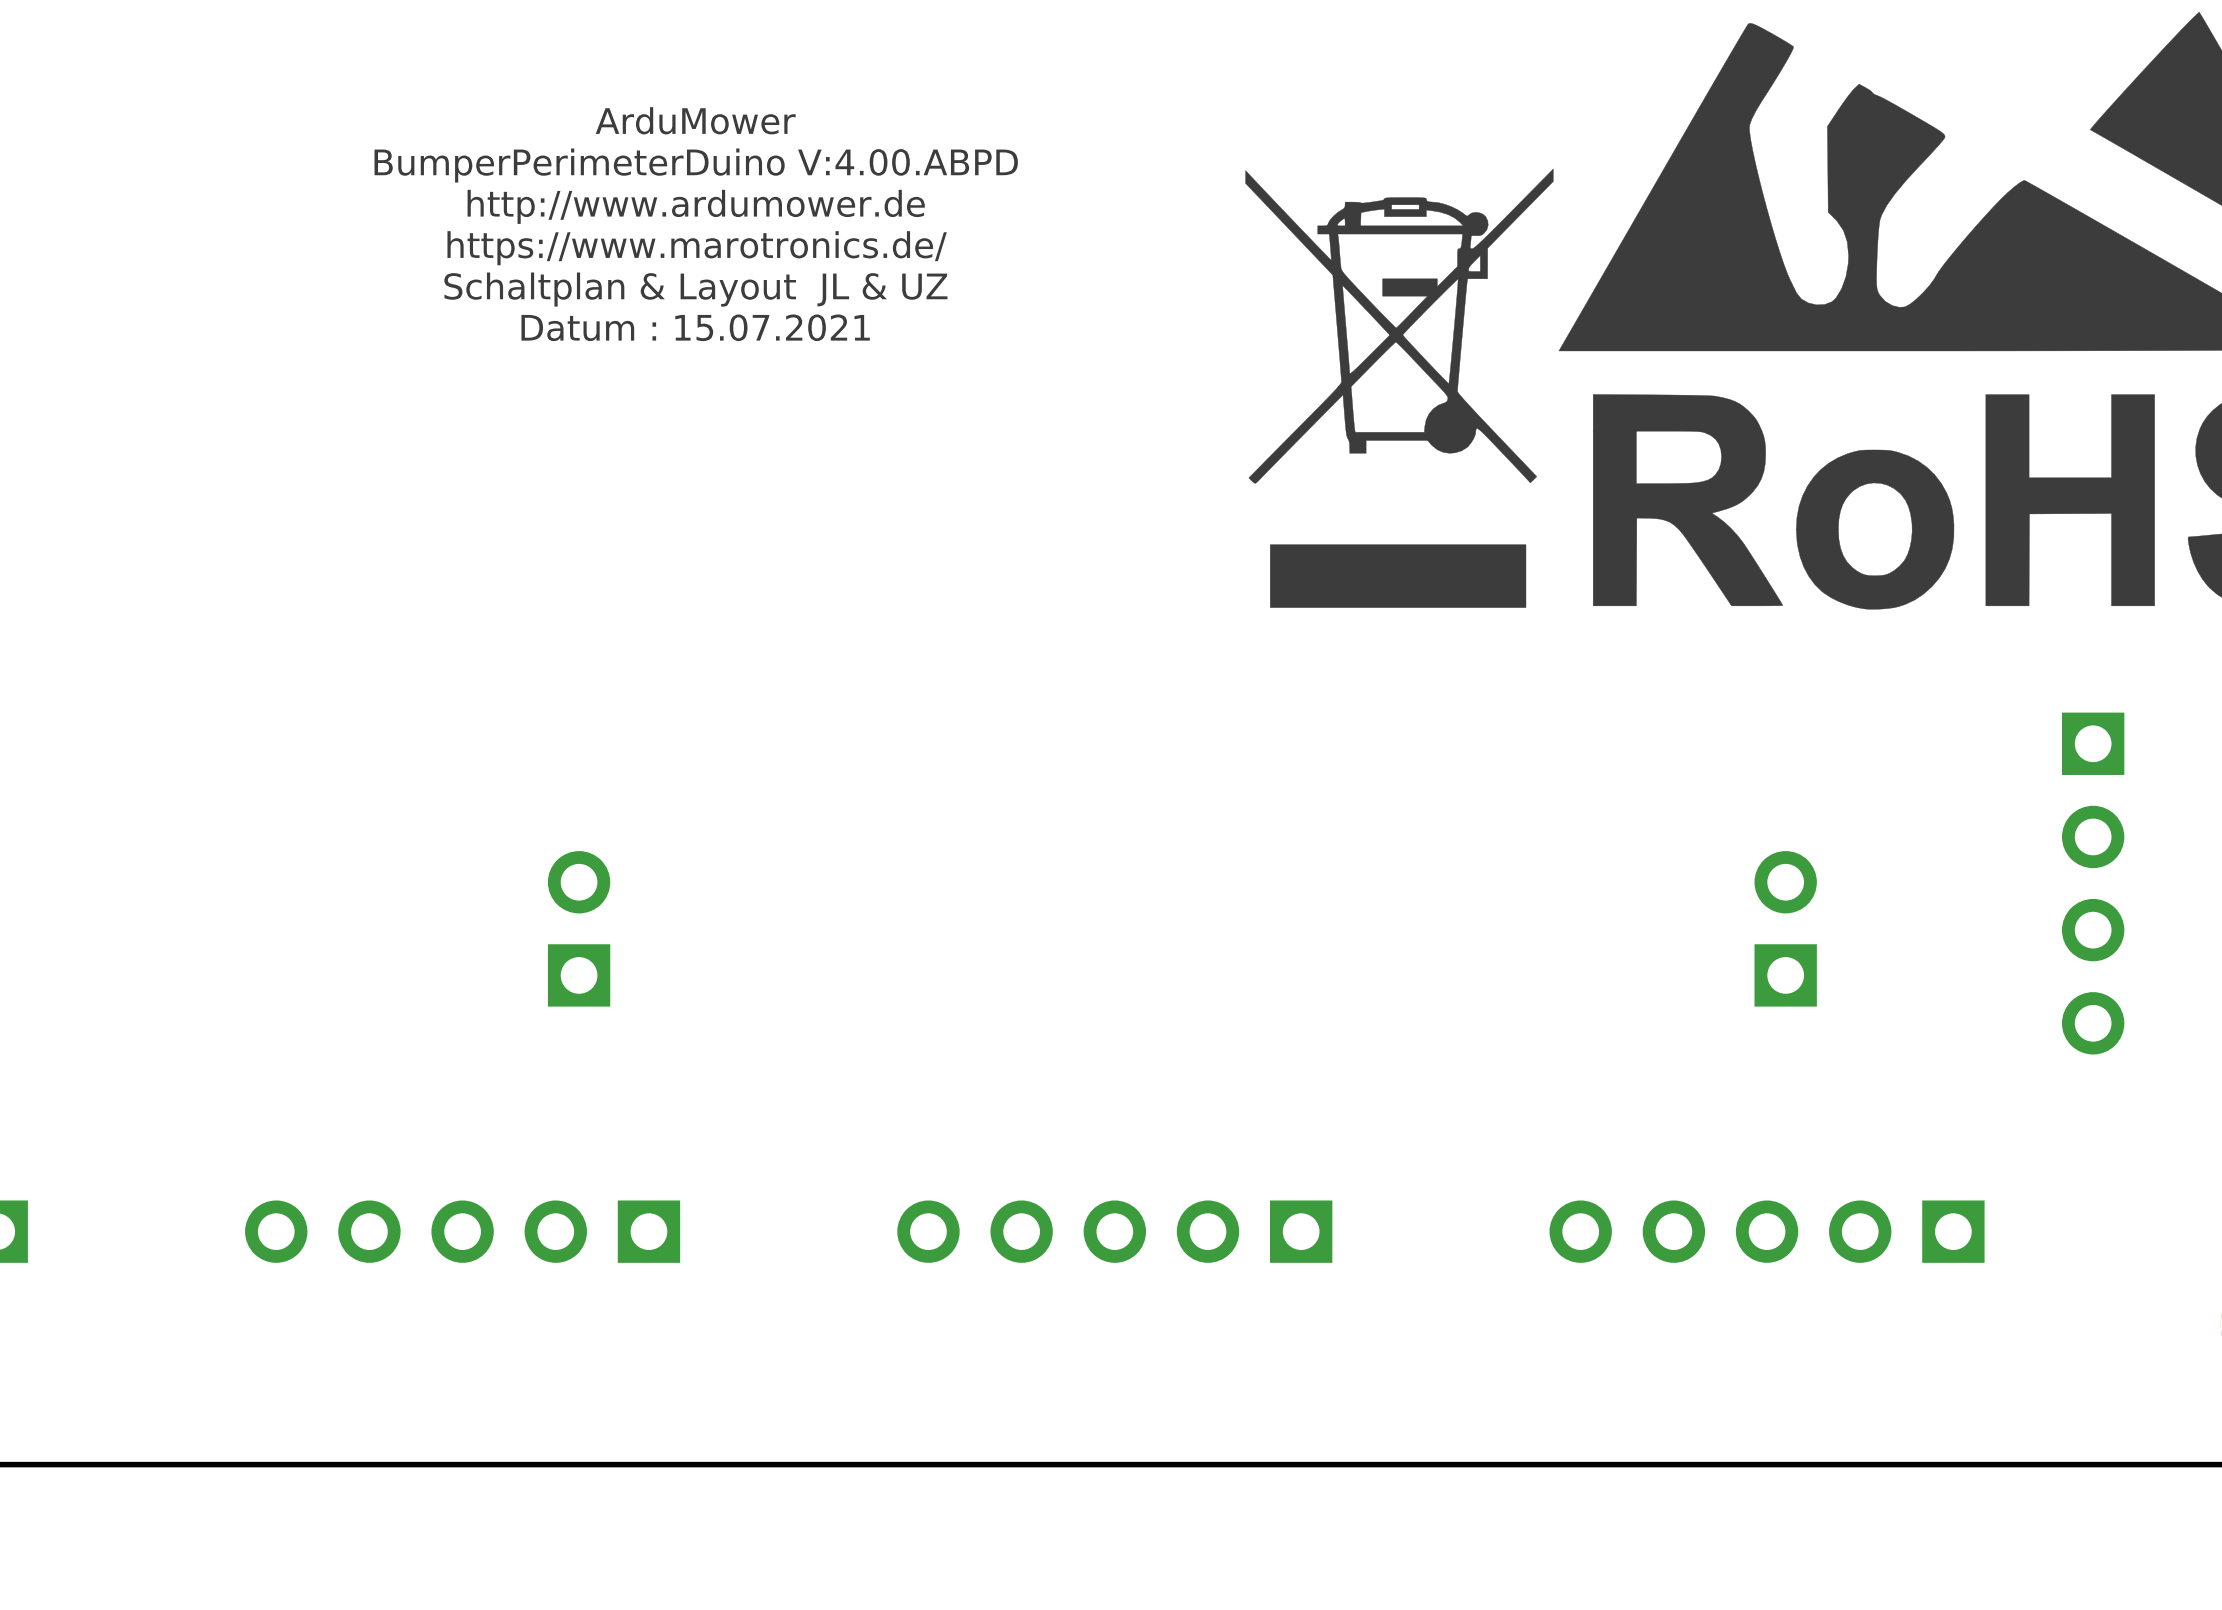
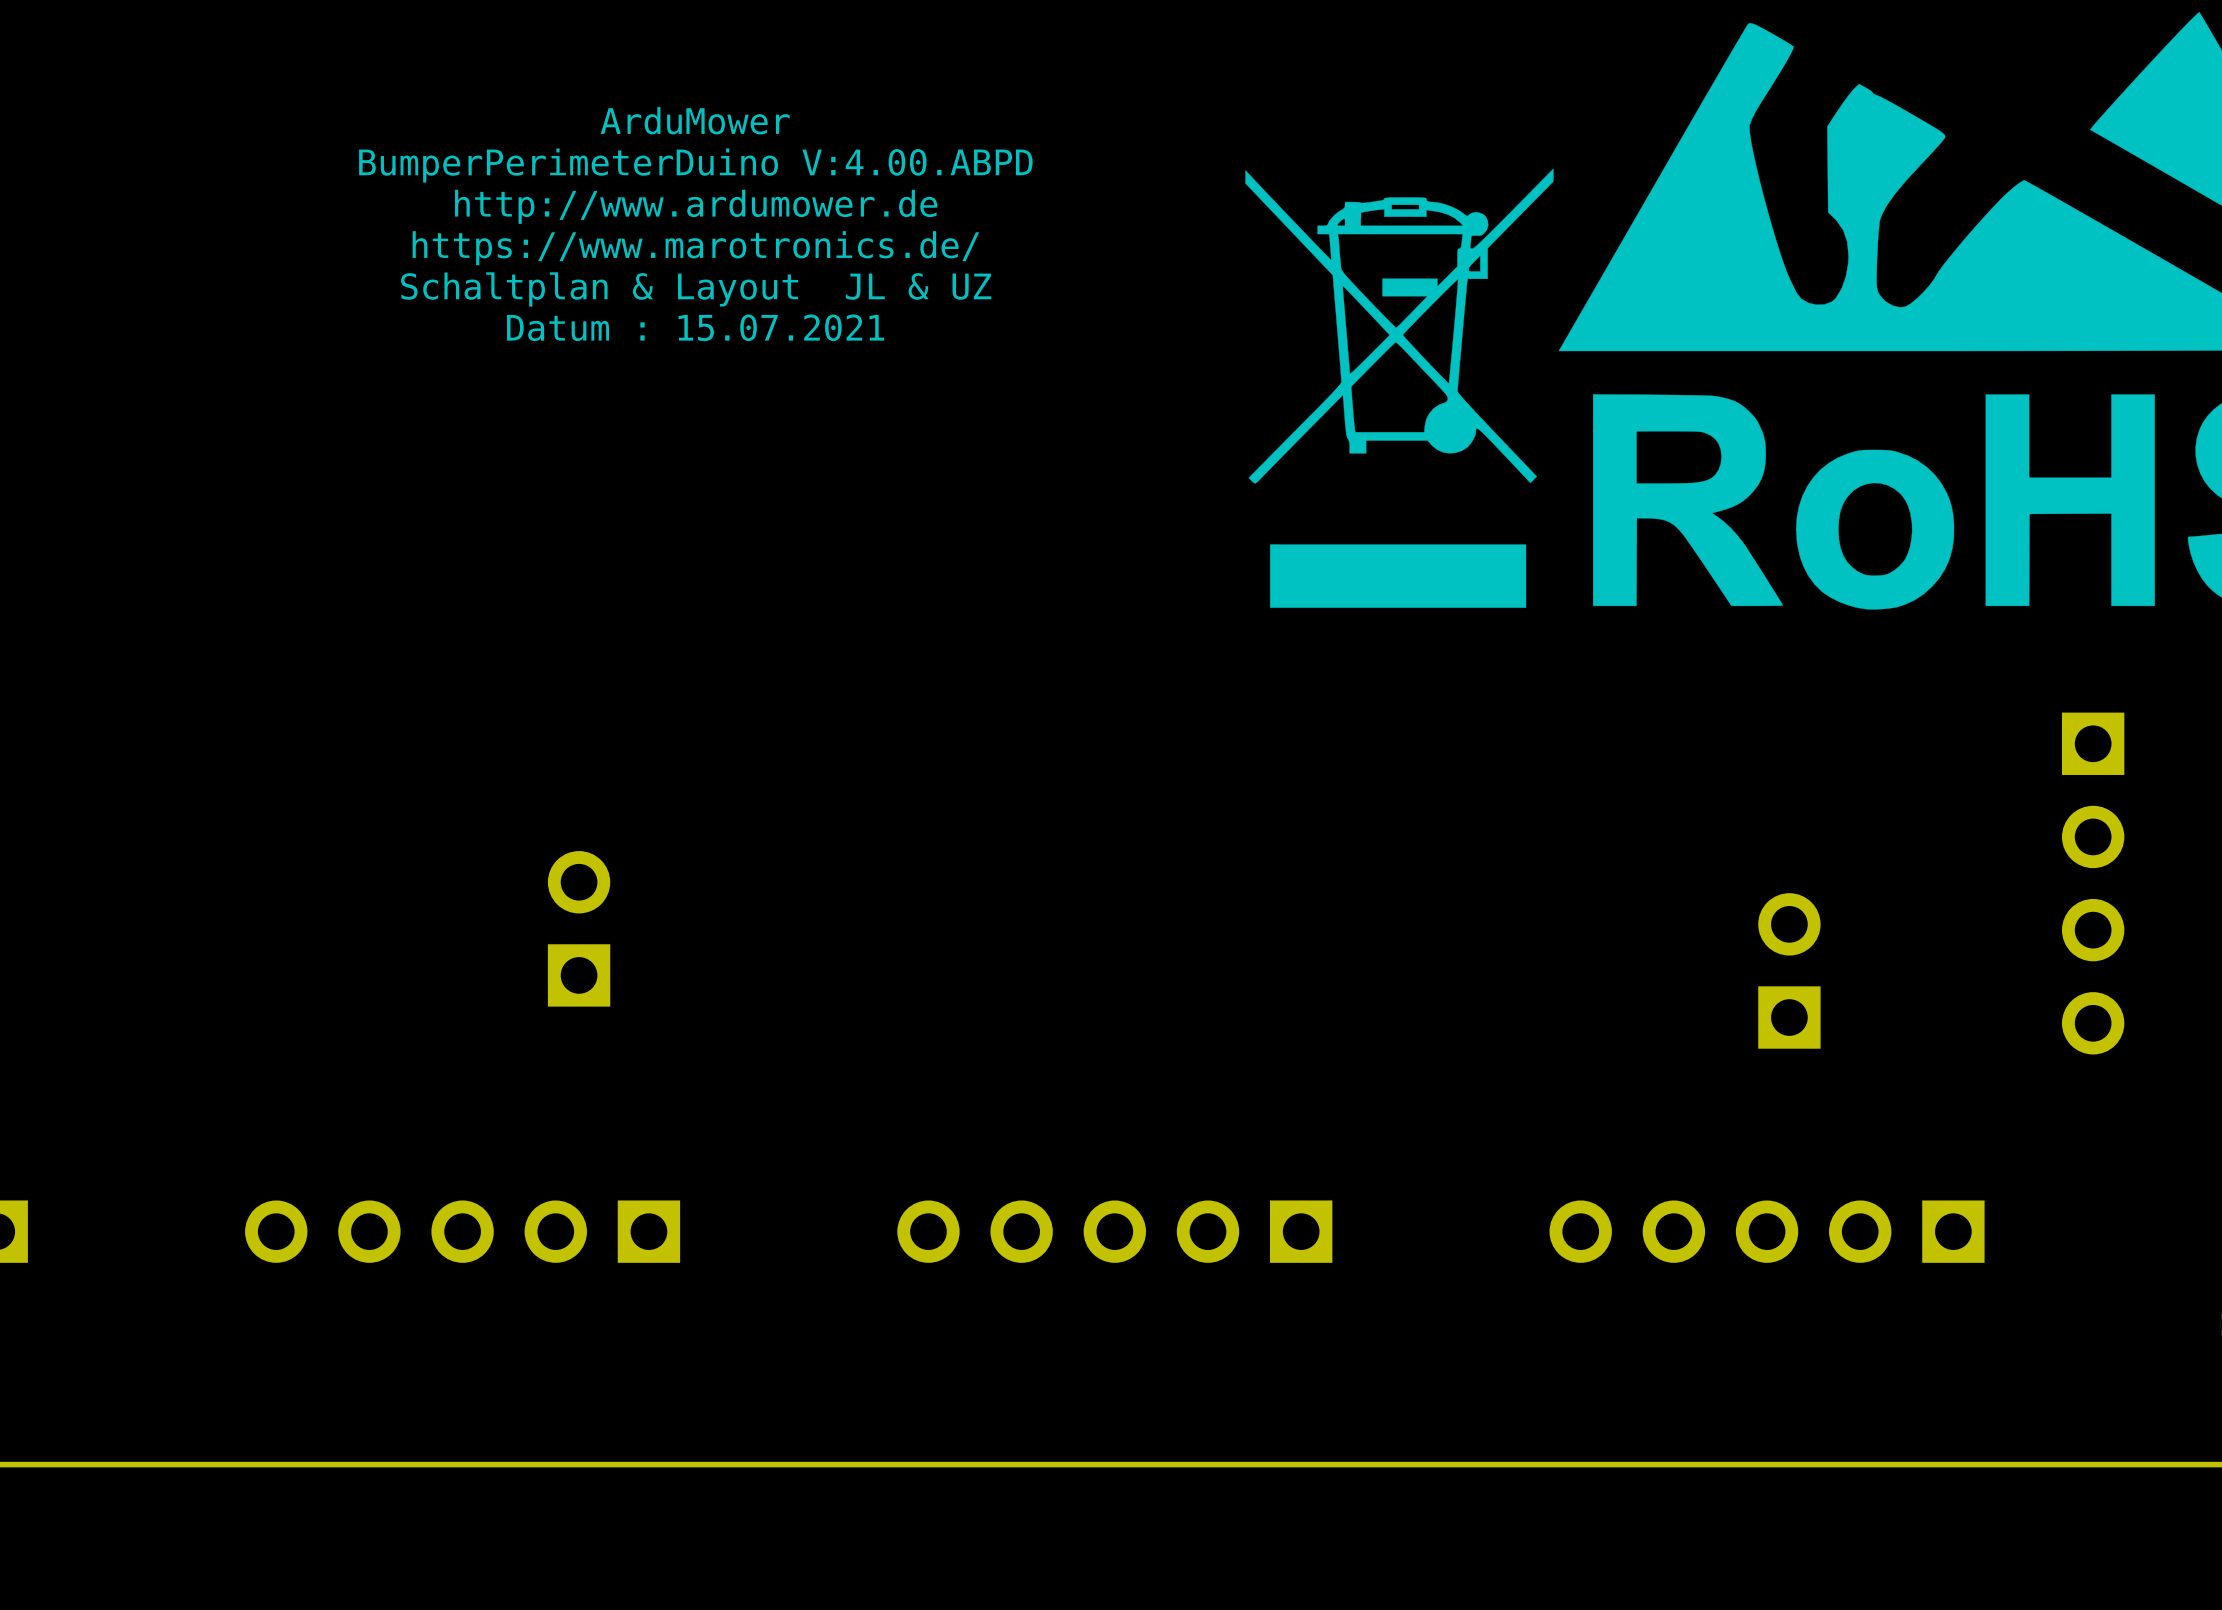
part position: (1785, 928) -> (1789, 970)

